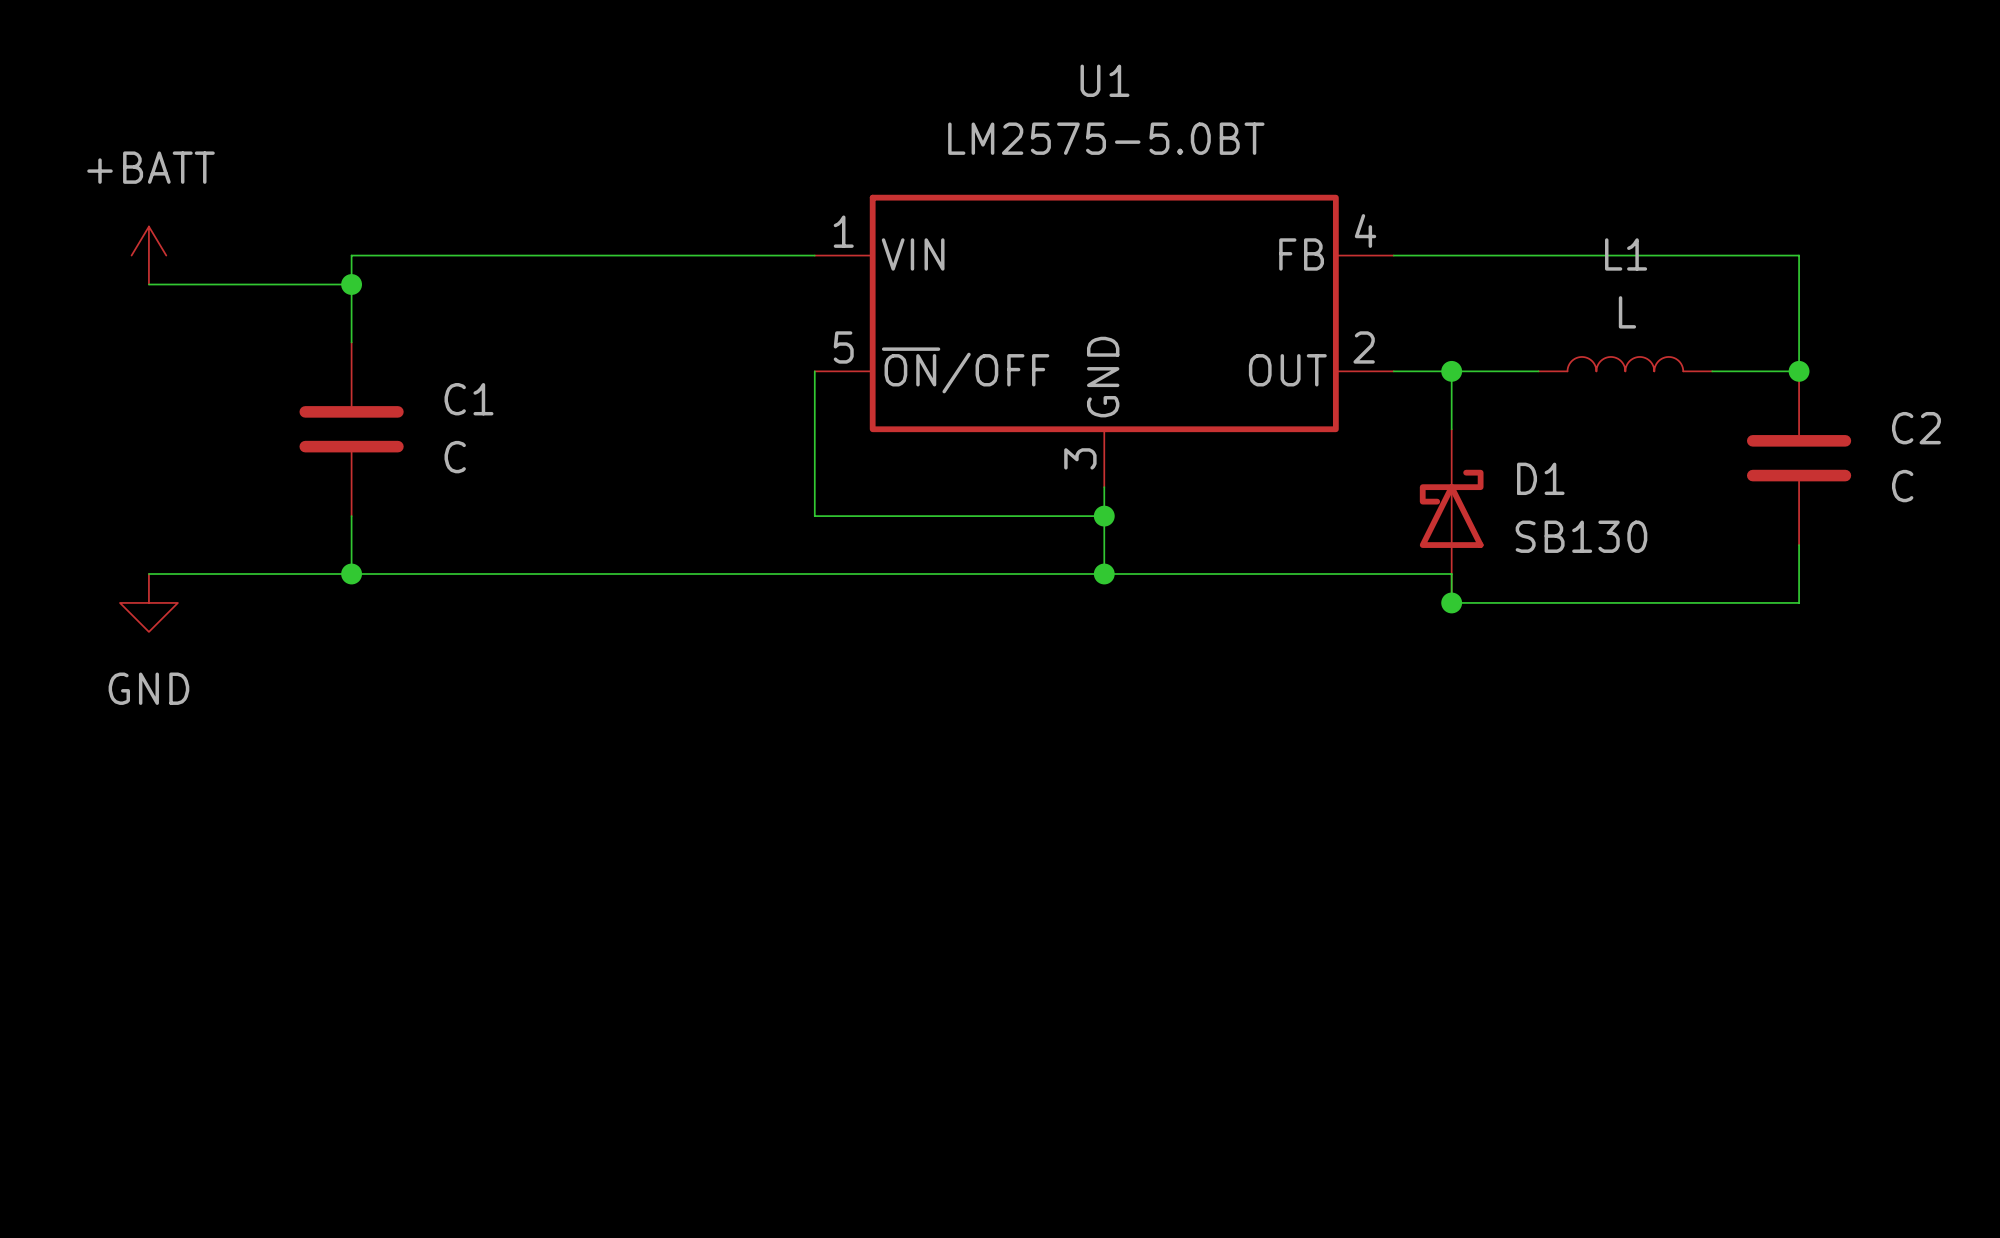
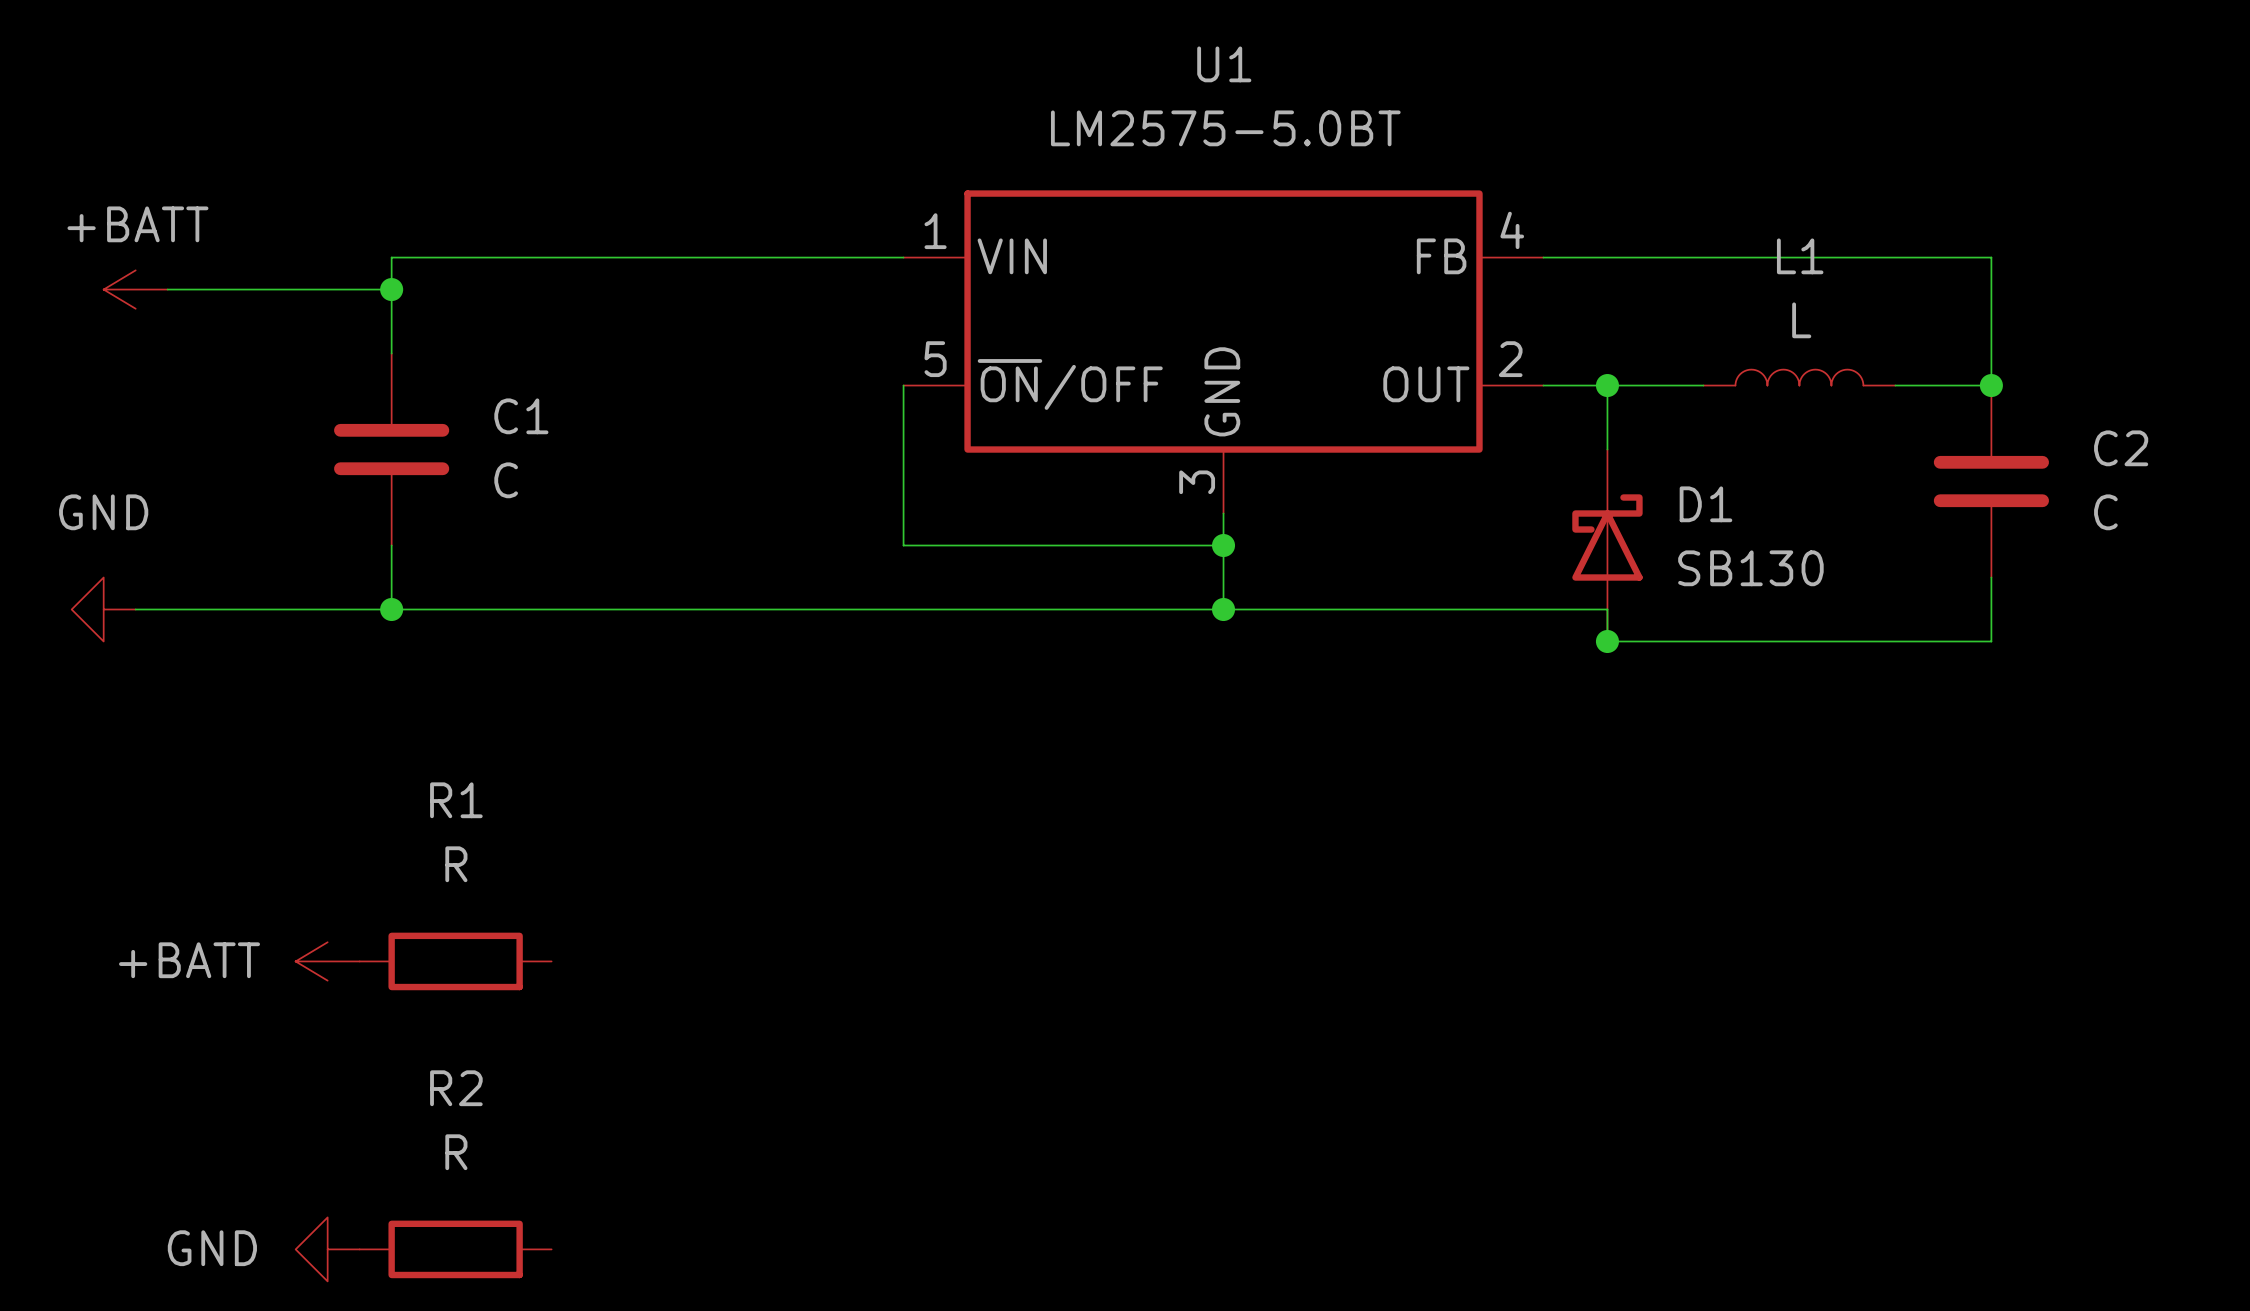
power symbol rotation: 0° (148, 255) -> 90° counterclockwise (135, 289)
power symbol position: +BATT (148, 255) -> +BATT (135, 289)
wire: none -> (135, 609) (167, 609)
power symbol rotation: 0° (148, 602) -> 90° clockwise (103, 609)
power symbol position: GND (148, 602) -> GND (103, 609)
power symbol text position: GND (148, 688) -> GND (103, 512)
power symbol: none -> +BATT (327, 961)
R1: none -> R (455, 961)
power symbol: none -> GND (327, 1249)
R2: none -> R (455, 1249)

